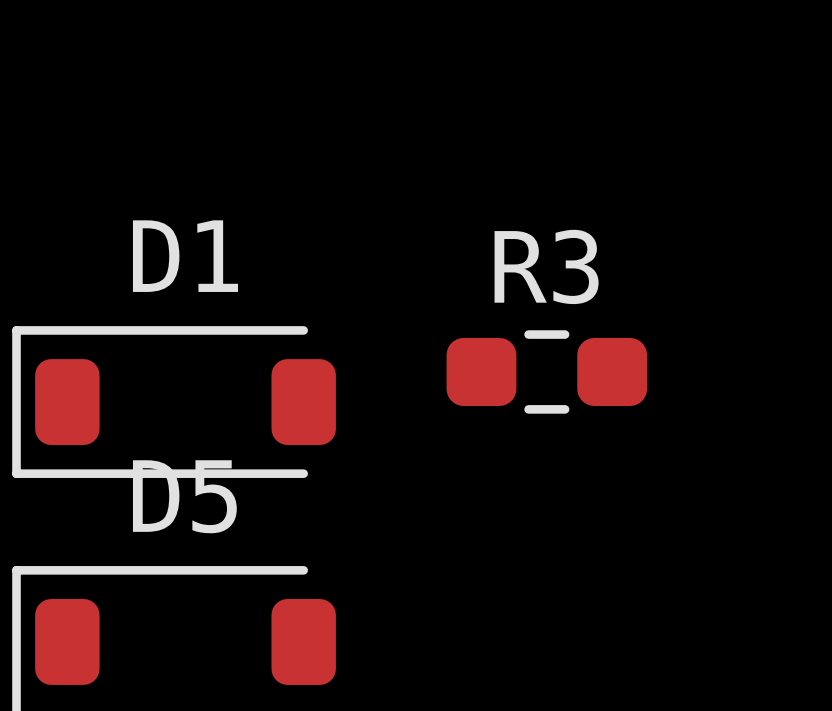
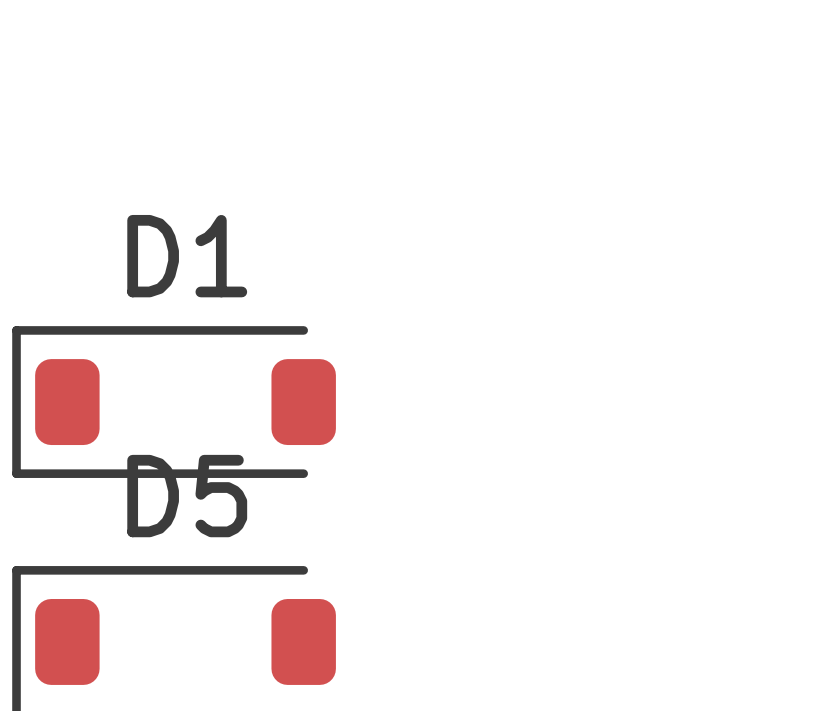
R3: (546, 371) -> none

